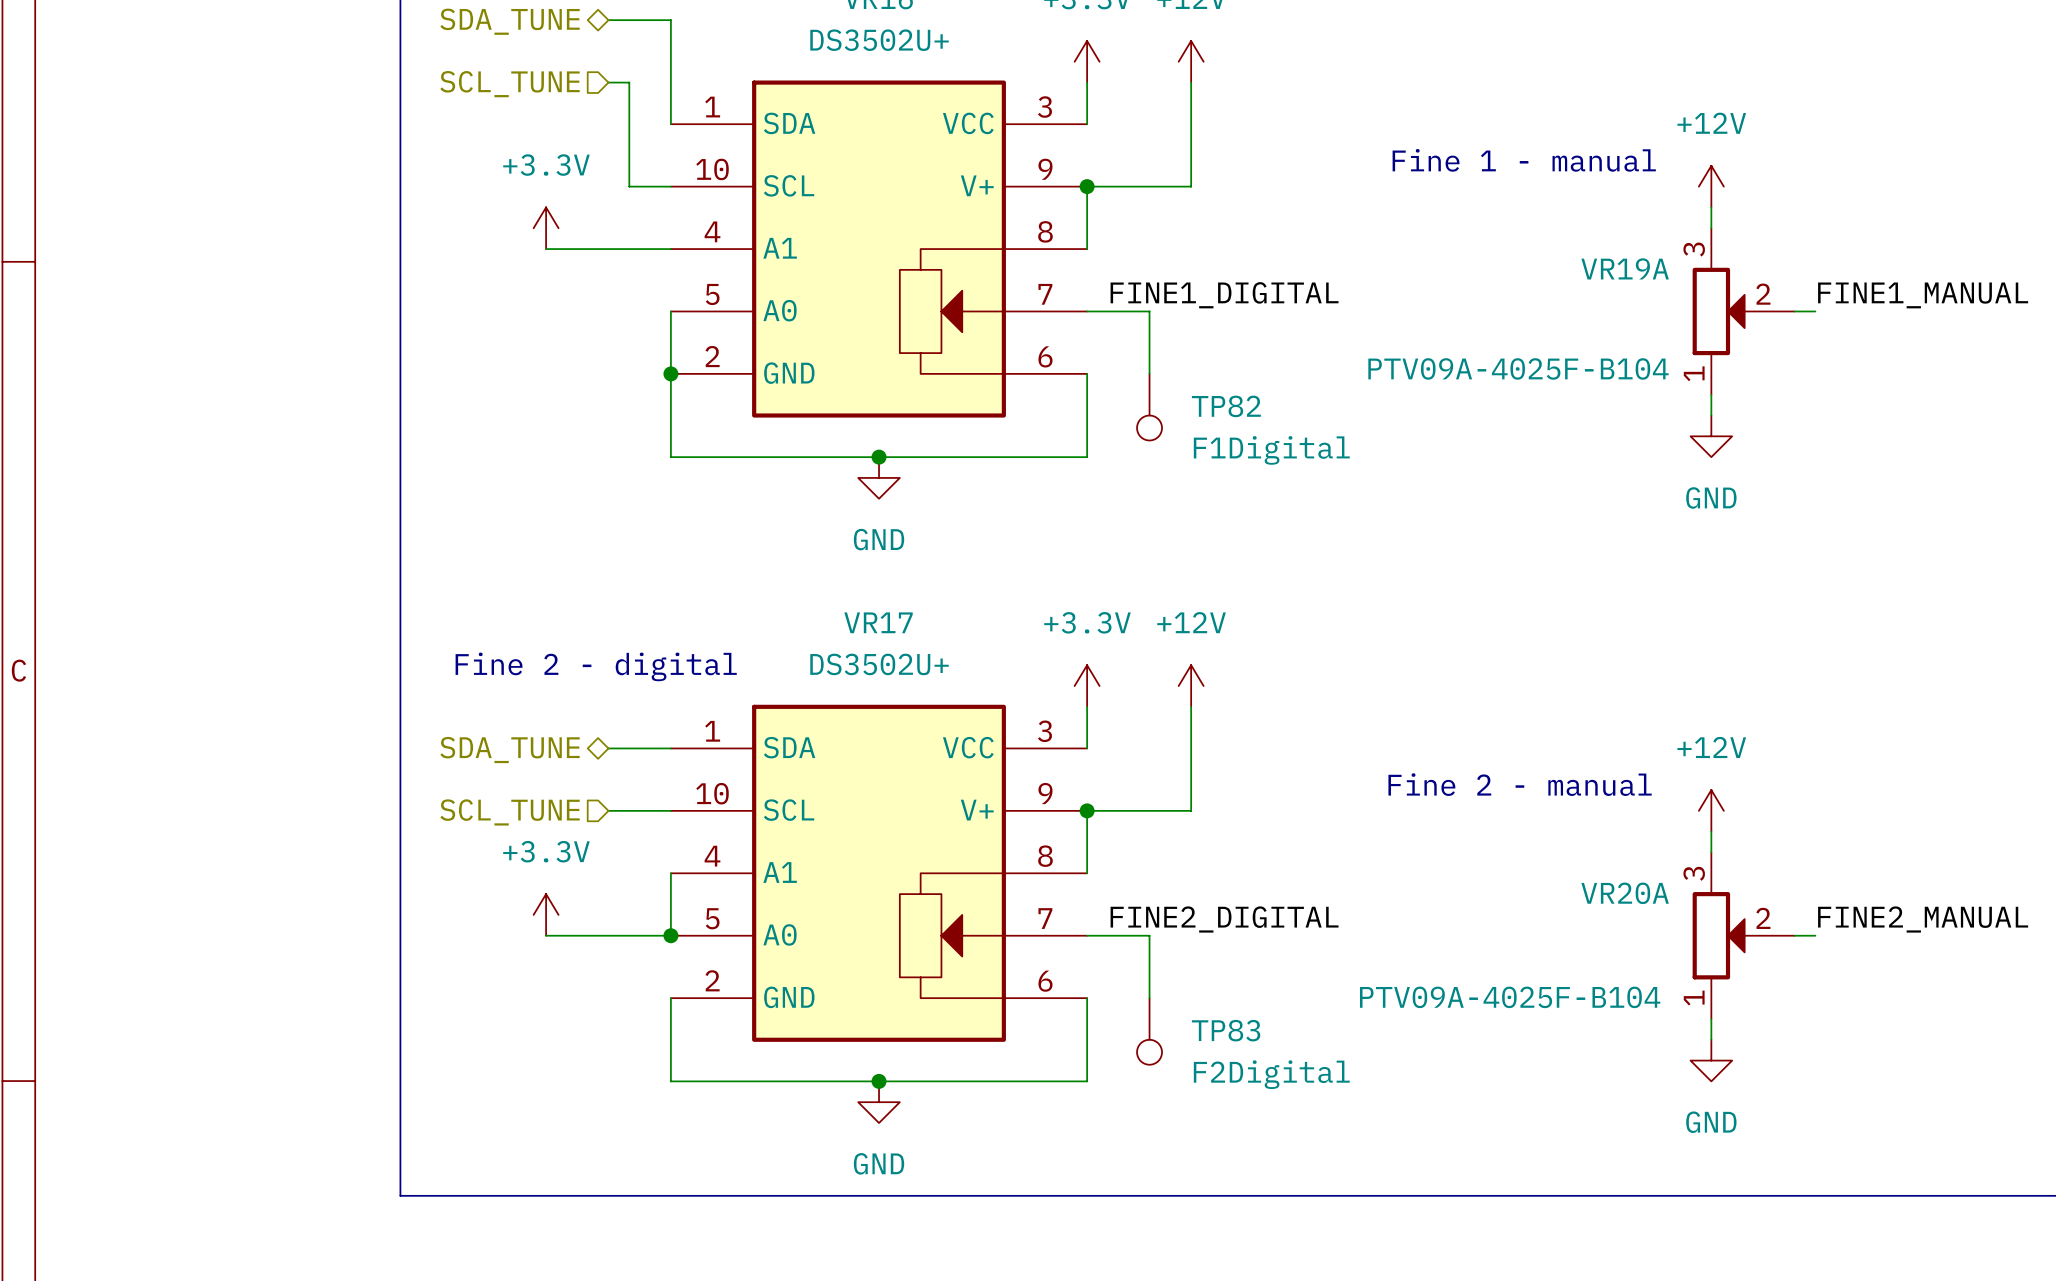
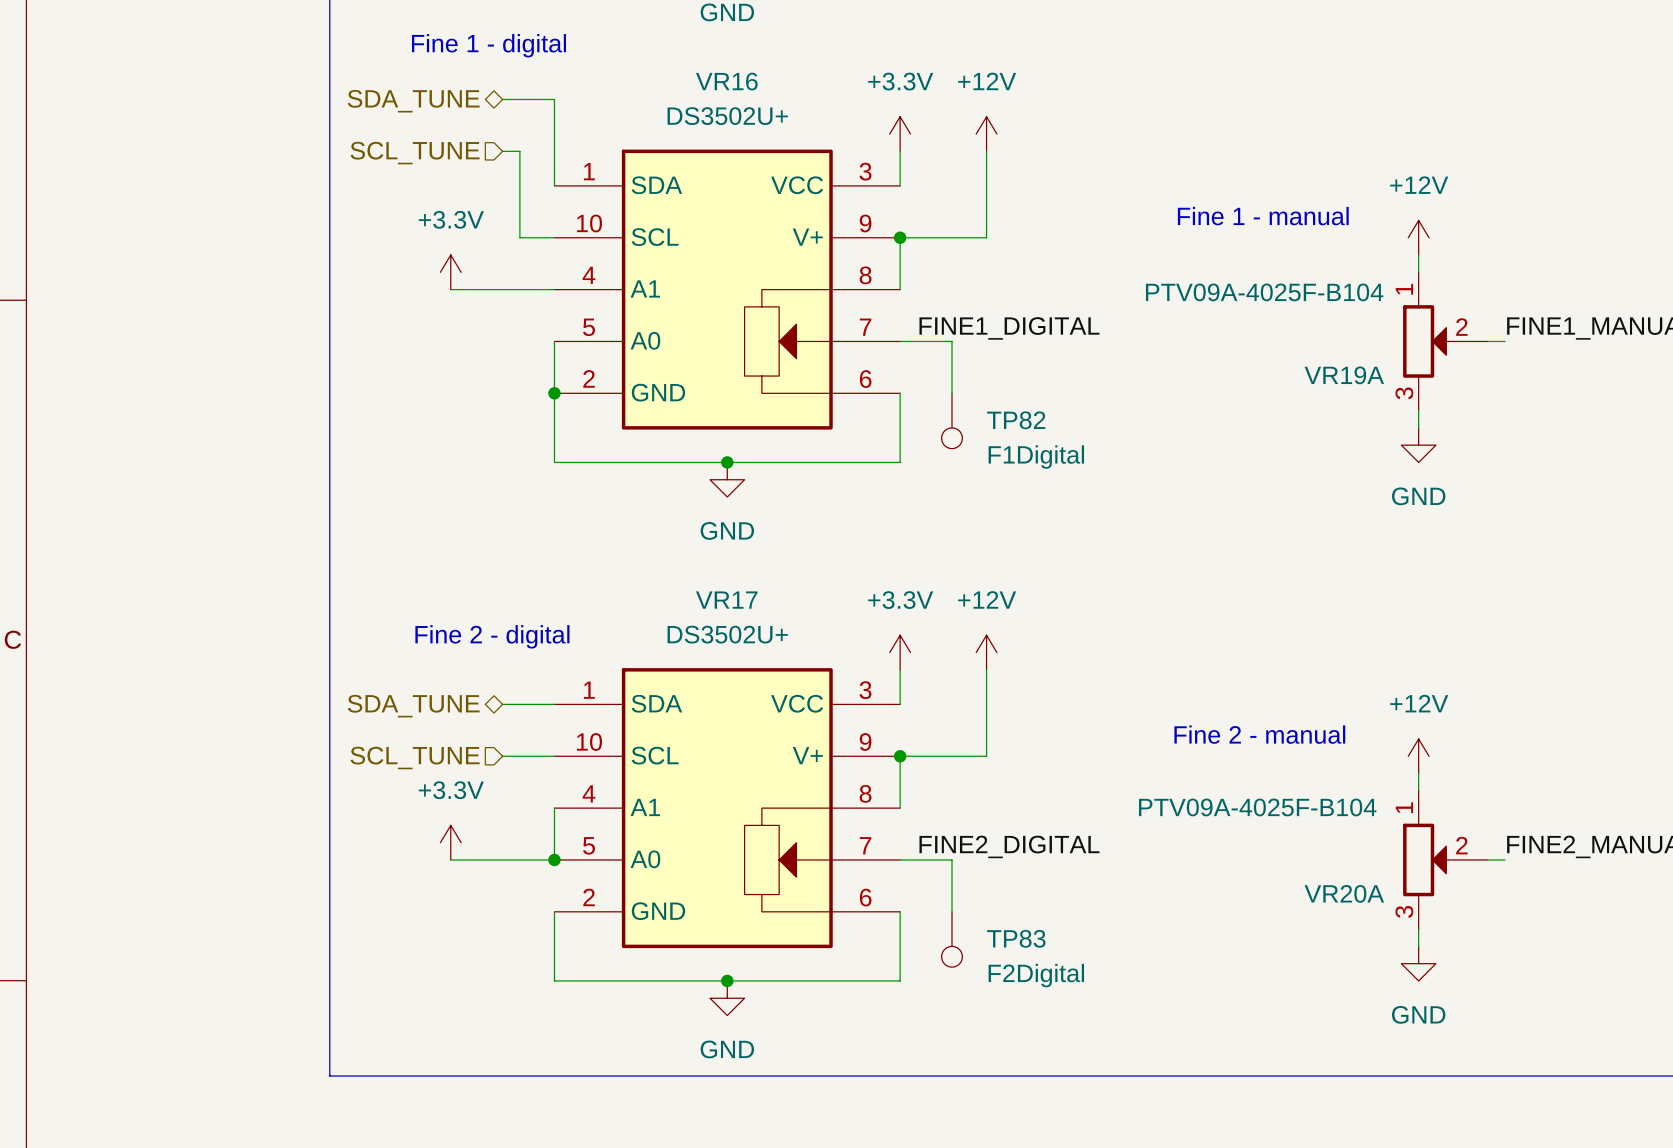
VR19A flip: as is (1718, 311) -> up-down (1424, 341)
VR20A flip: as is (1718, 935) -> up-down (1424, 859)

